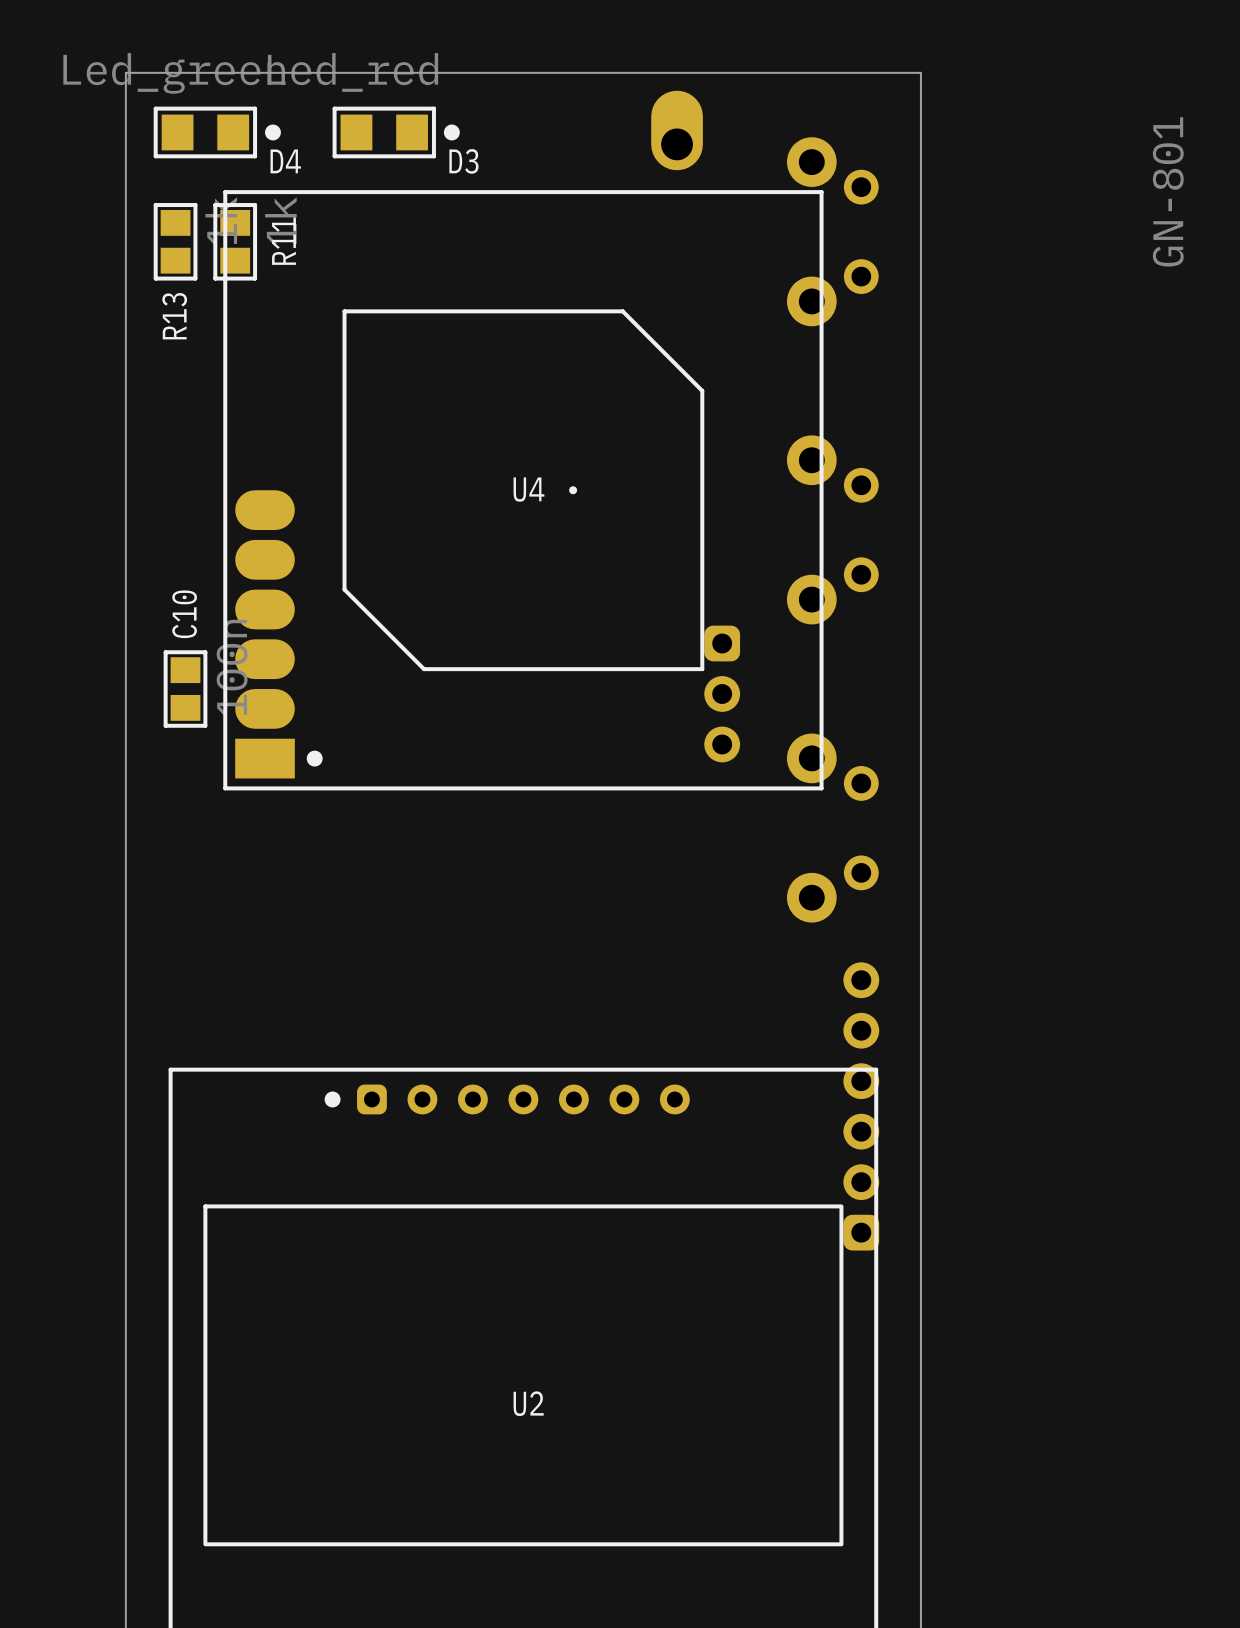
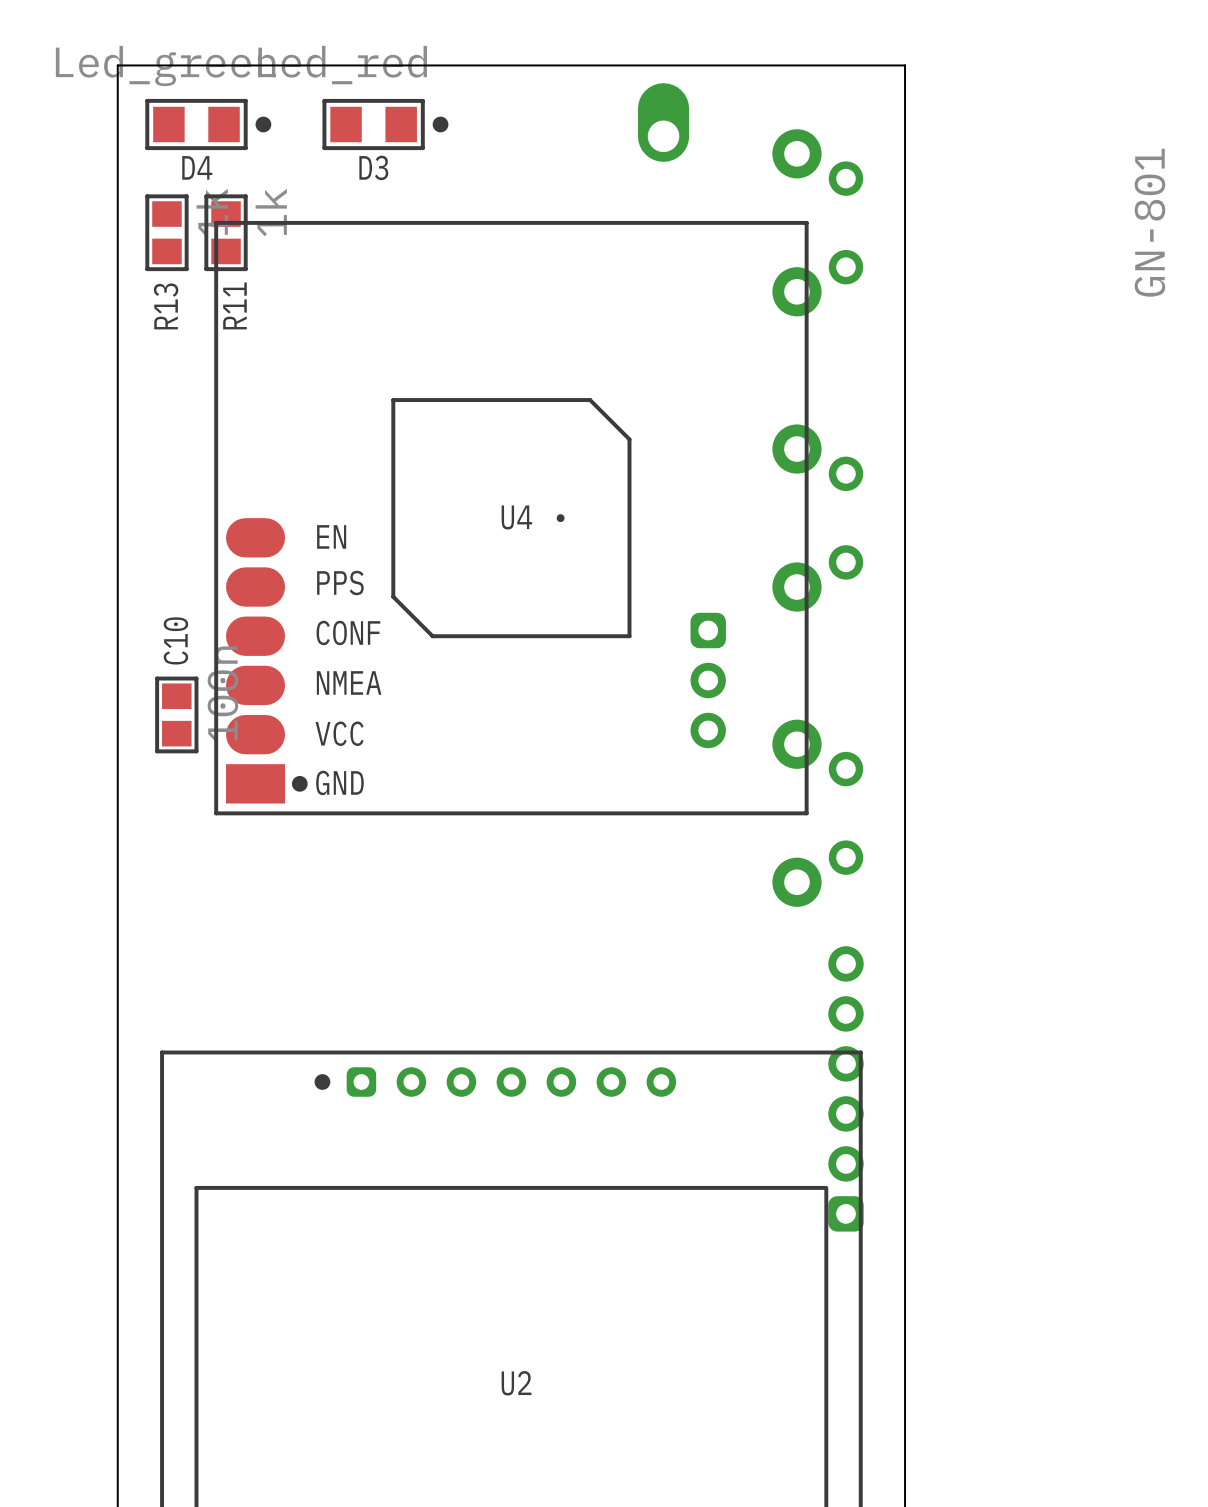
D4 name position: D4 (285, 161) -> D4 (197, 167)
D3 name position: D3 (463, 161) -> D3 (373, 167)
U4 footprint: [223, 190, 824, 791] -> [214, 220, 809, 816]
R11 name position: R11 (284, 241) -> R11 (234, 305)
C10 position: (185, 689) -> (176, 714)

